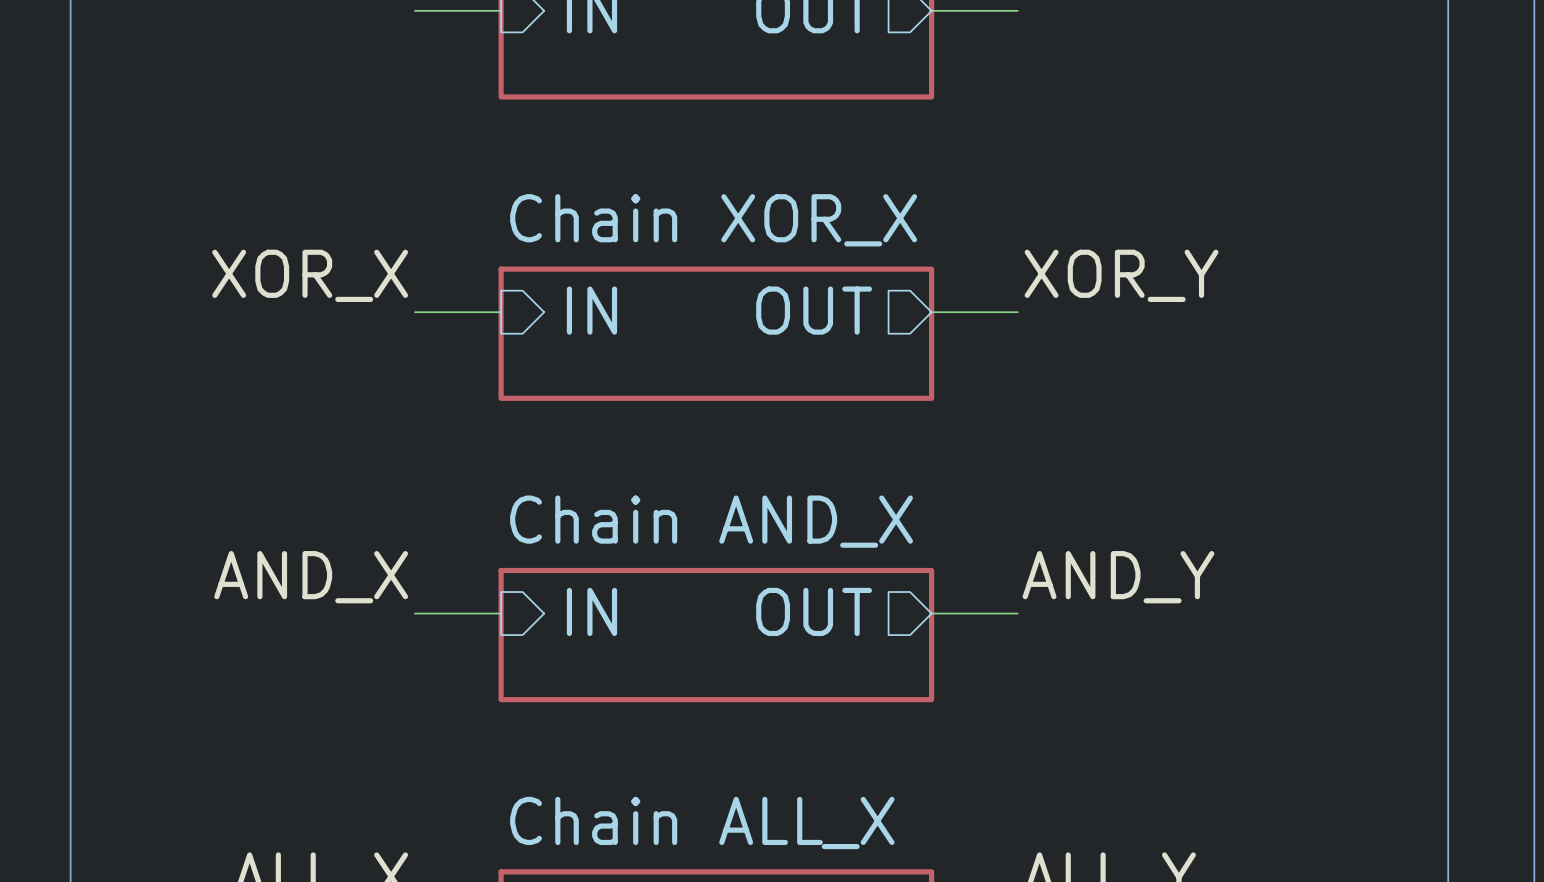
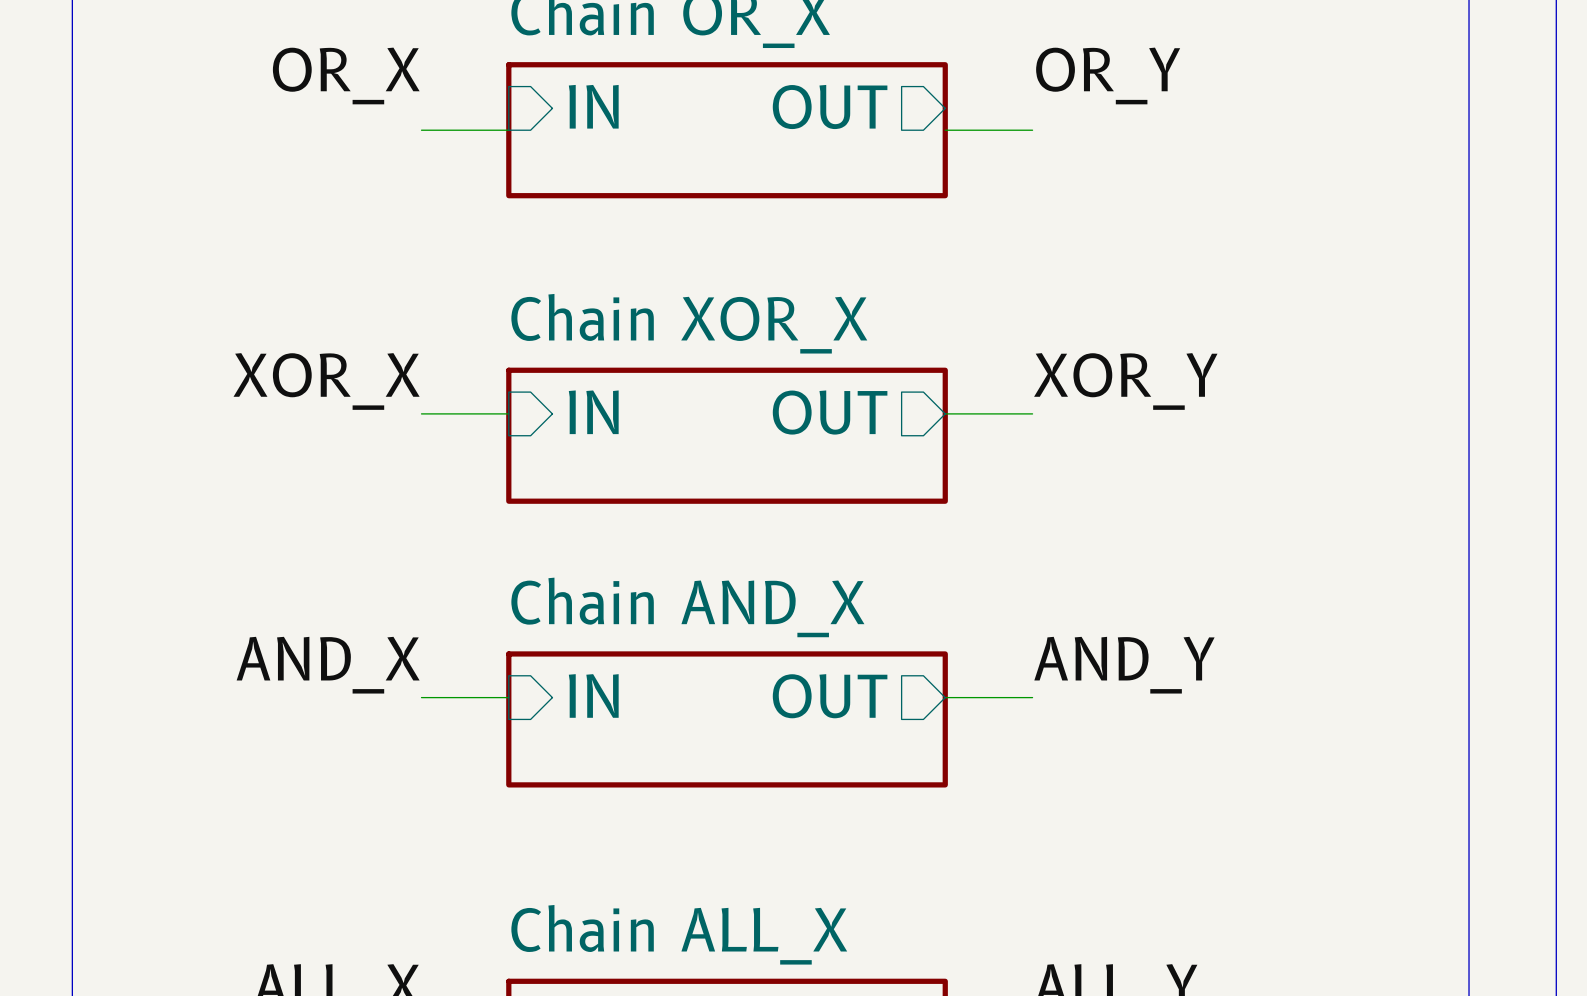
wire: (415, 10) (501, 10) -> (421, 130) (508, 130)
wire: (931, 10) (1017, 10) -> (945, 130) (1032, 130)
label position: AND_X (311, 577) -> AND_X (328, 665)
label position: AND_Y (1118, 577) -> AND_Y (1124, 665)
sheet pin position: IN (591, 611) -> IN (593, 695)
sheet pin position: OUT (814, 611) -> OUT (830, 696)
wire: (415, 613) (501, 613) -> (421, 697) (508, 697)
wire: (931, 613) (1017, 613) -> (945, 697) (1032, 697)
sheet Chain AND_X position: (716, 635) -> (727, 719)

